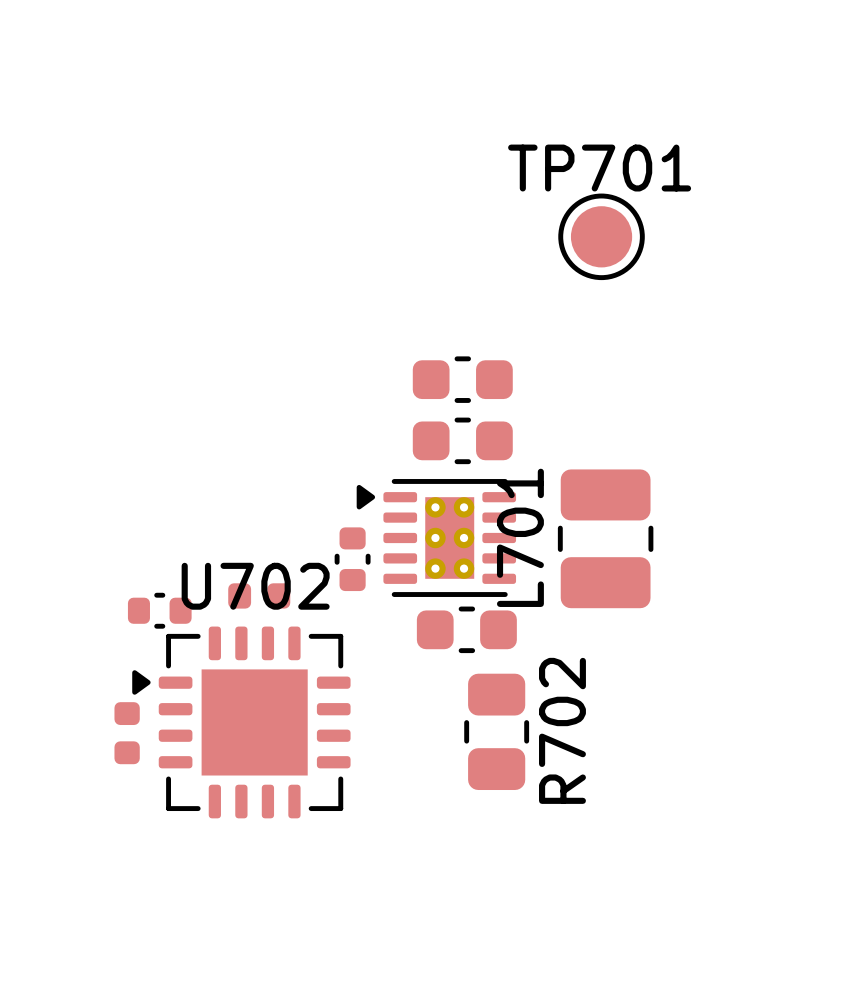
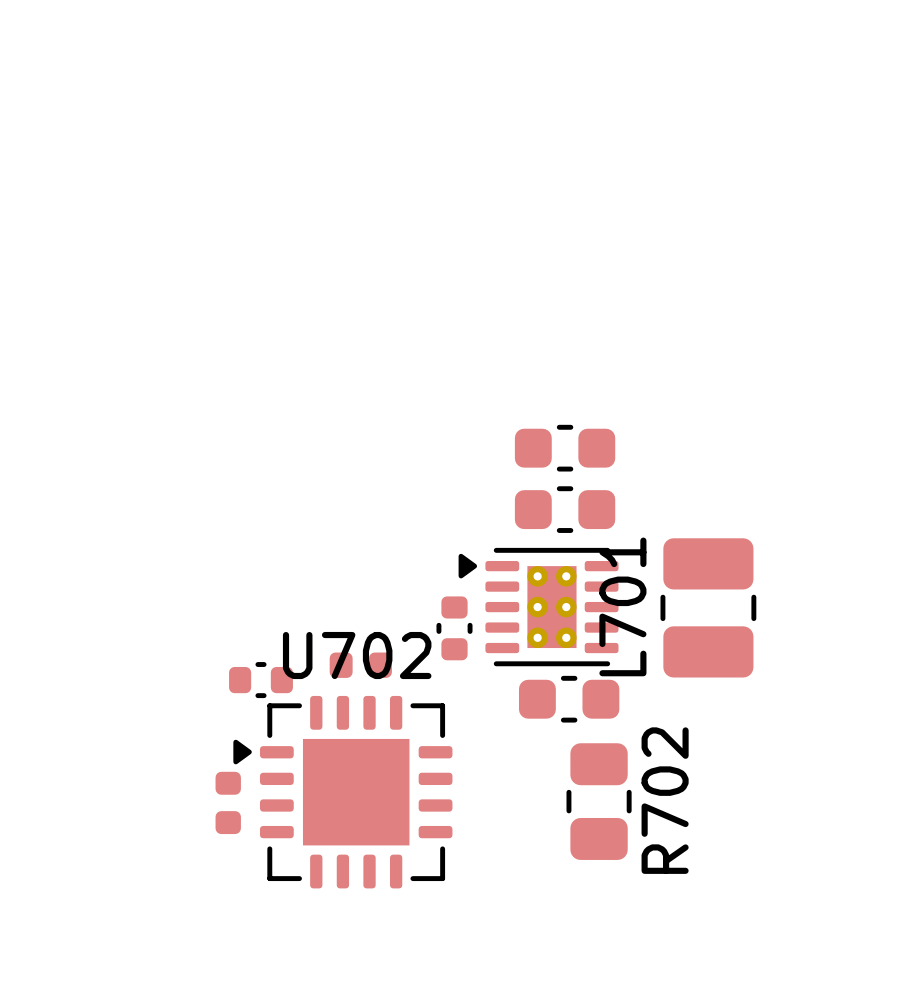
TP701: (601, 236) -> none

